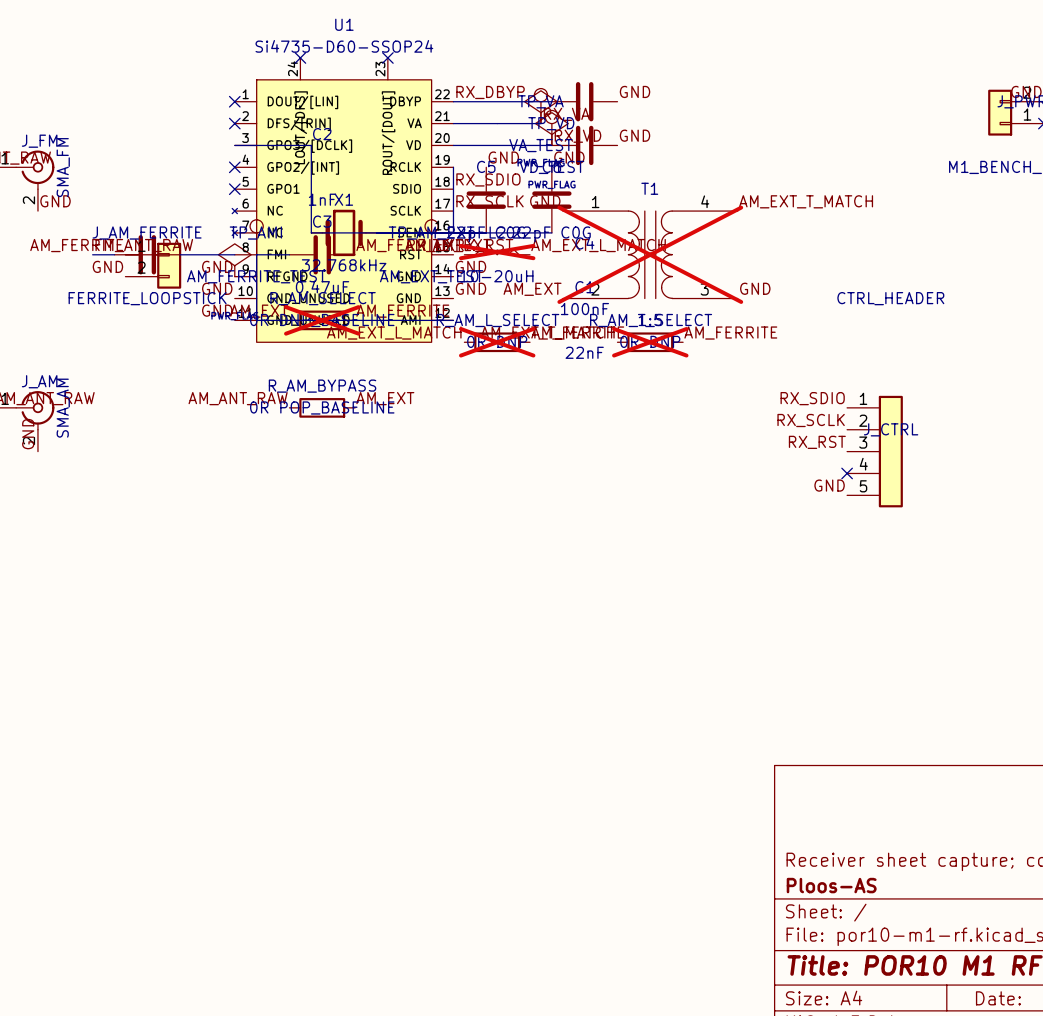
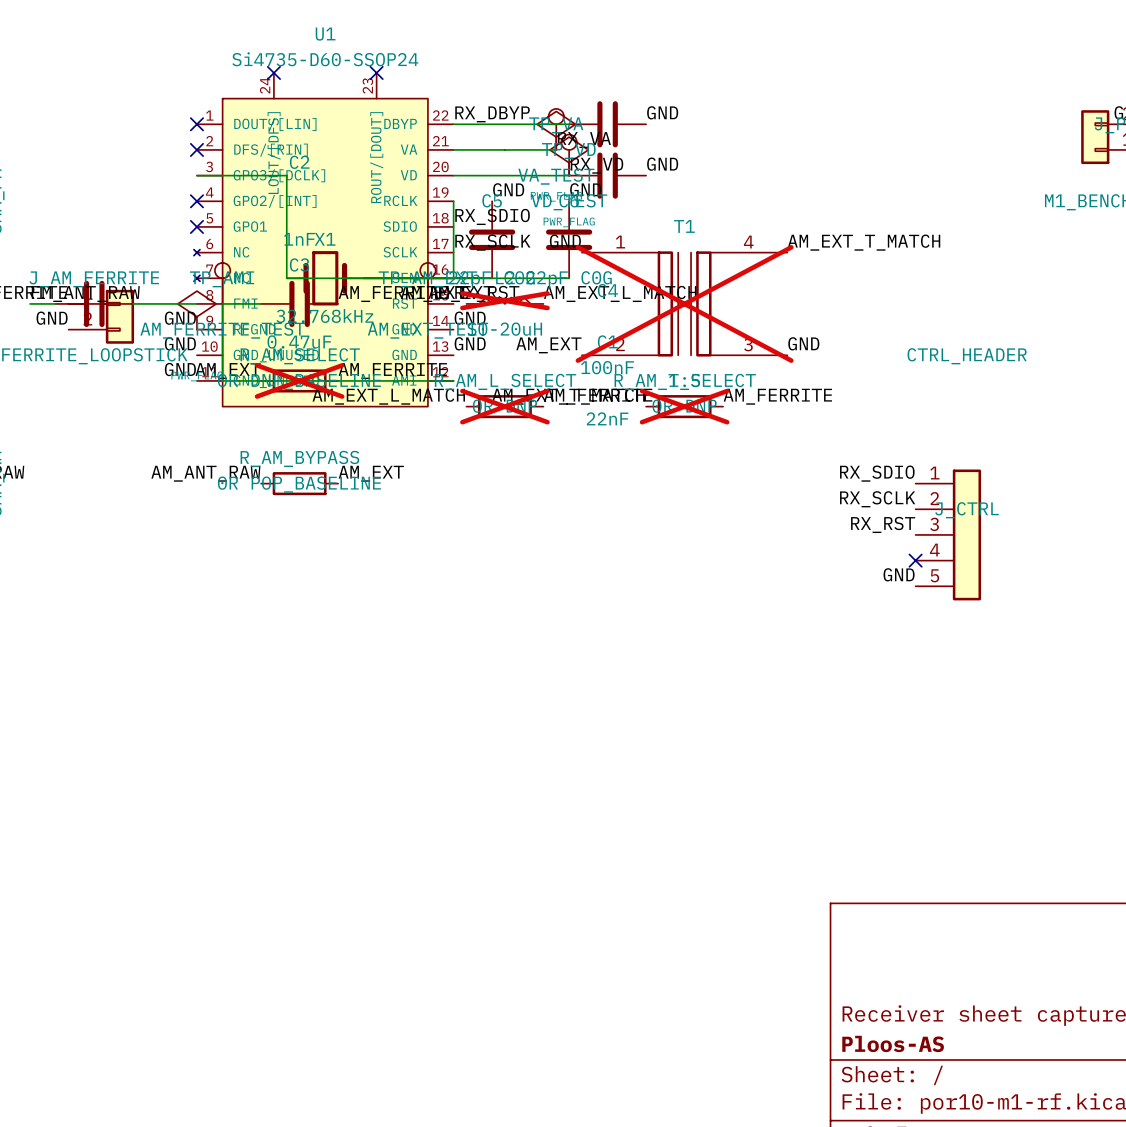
T1 symbol: [562, 211, 738, 299] -> [581, 251, 788, 357]

